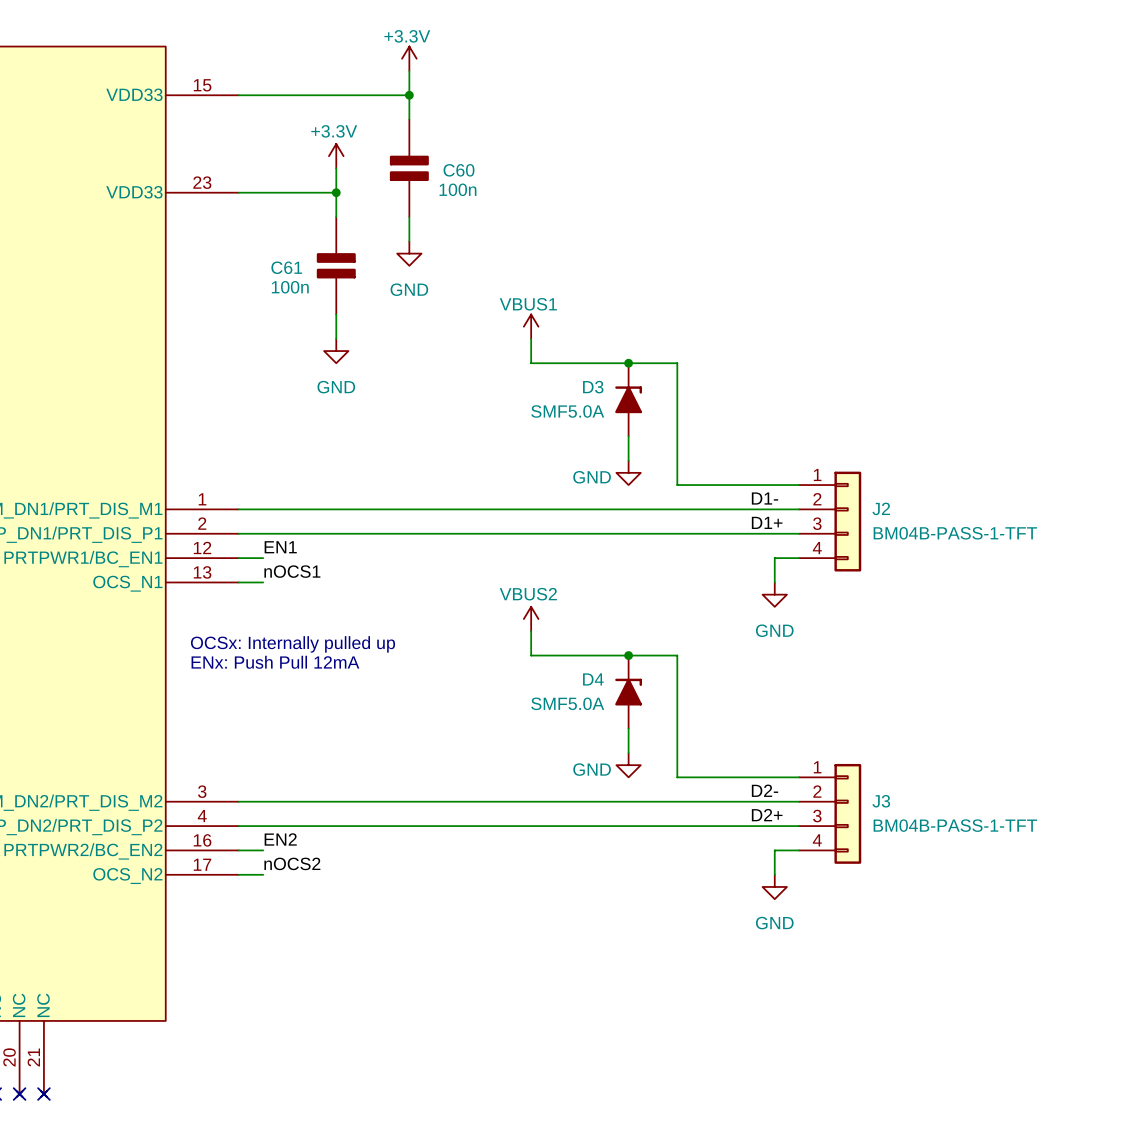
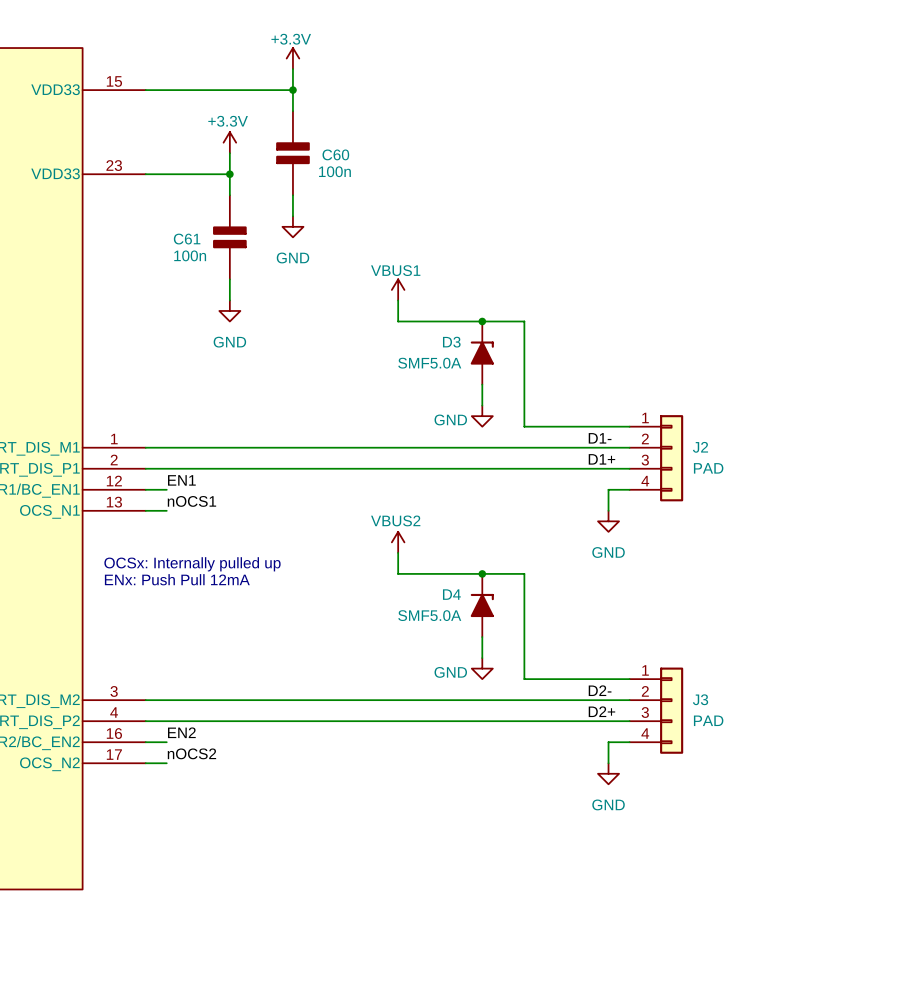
J2 value: BM04B-PASS-1-TFT (955, 533) -> PAD (708, 468)
J3 value: BM04B-PASS-1-TFT (955, 825) -> PAD (708, 720)

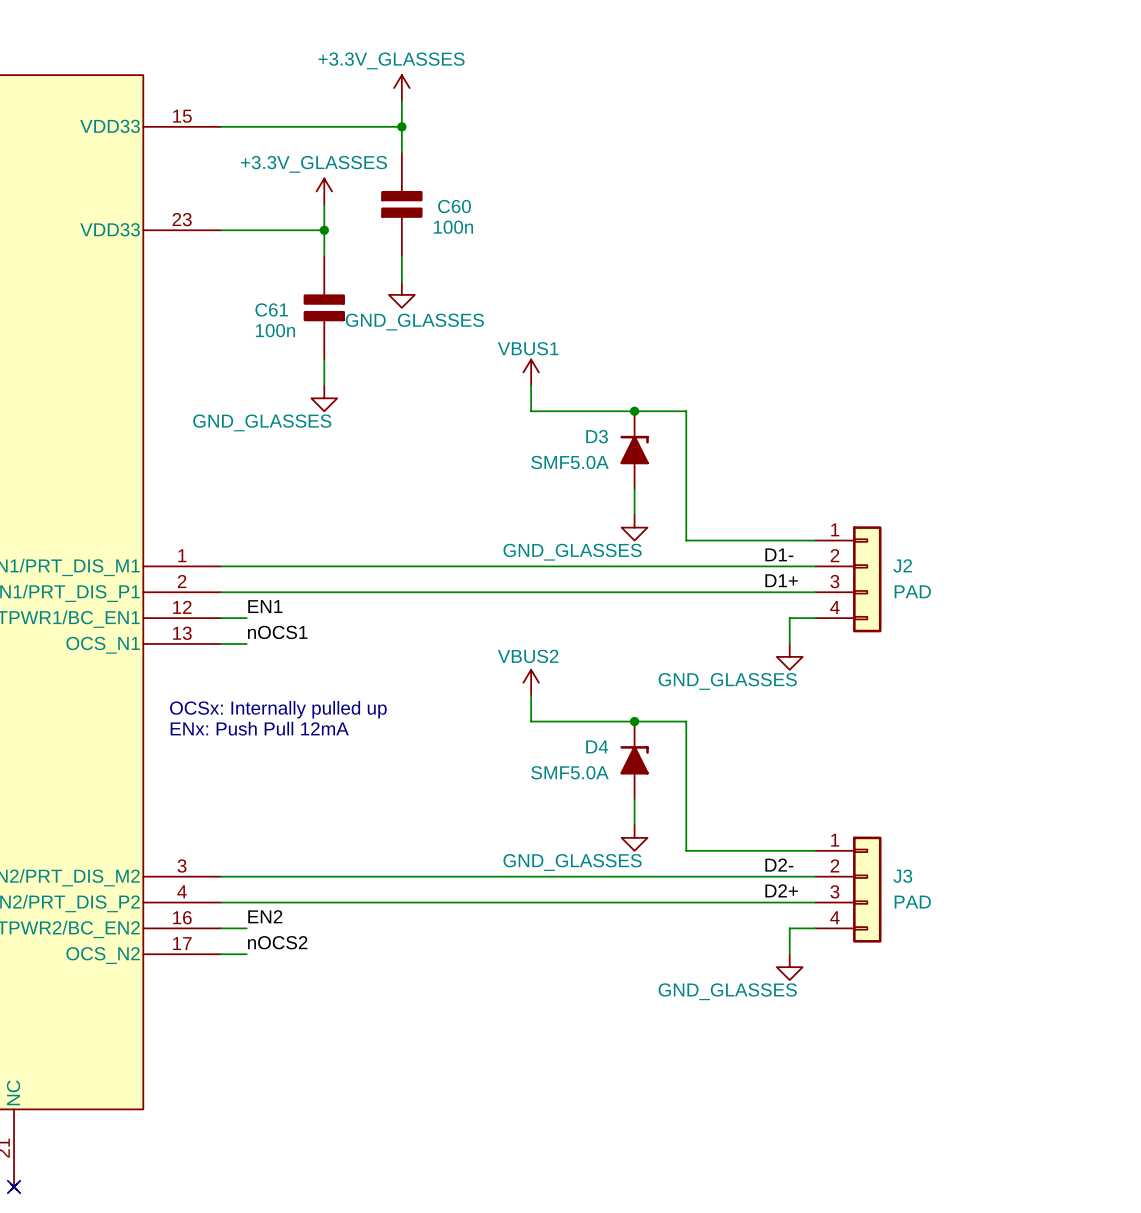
power symbol: +3.3V (292, 58) -> +3.3V_GLASSES (401, 88)
power symbol: +3.3V (229, 142) -> +3.3V_GLASSES (324, 191)
power symbol: GND (292, 226) -> GND_GLASSES (401, 294)
power symbol: GND (229, 310) -> GND_GLASSES (324, 398)
power symbol: GND (482, 416) -> GND_GLASSES (634, 527)
power symbol: GND (608, 521) -> GND_GLASSES (789, 656)
power symbol: GND (482, 668) -> GND_GLASSES (634, 837)
power symbol: GND (608, 773) -> GND_GLASSES (789, 967)

